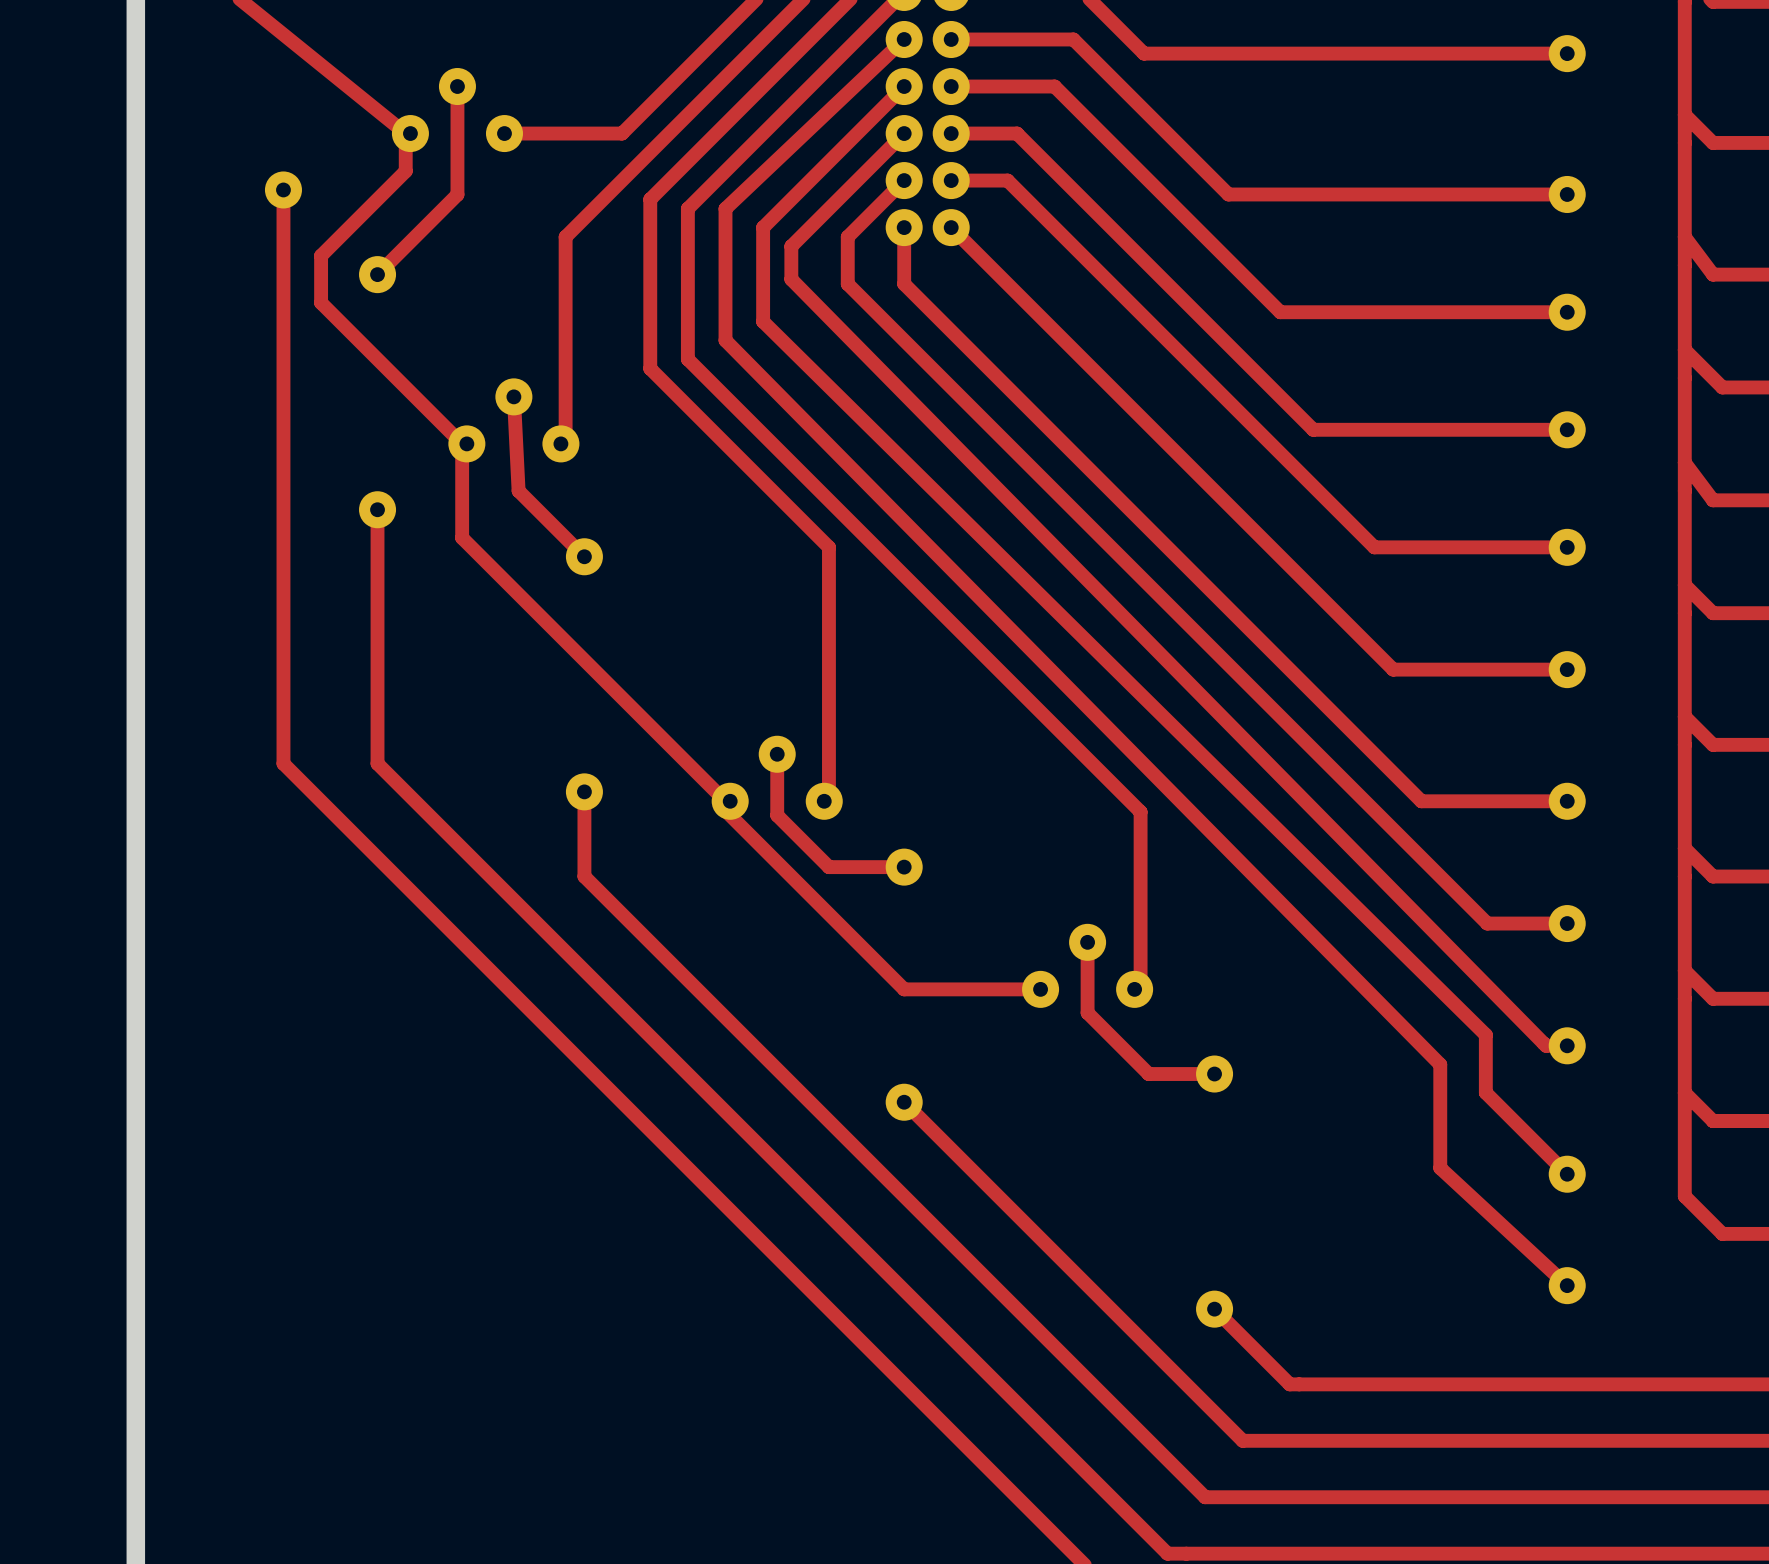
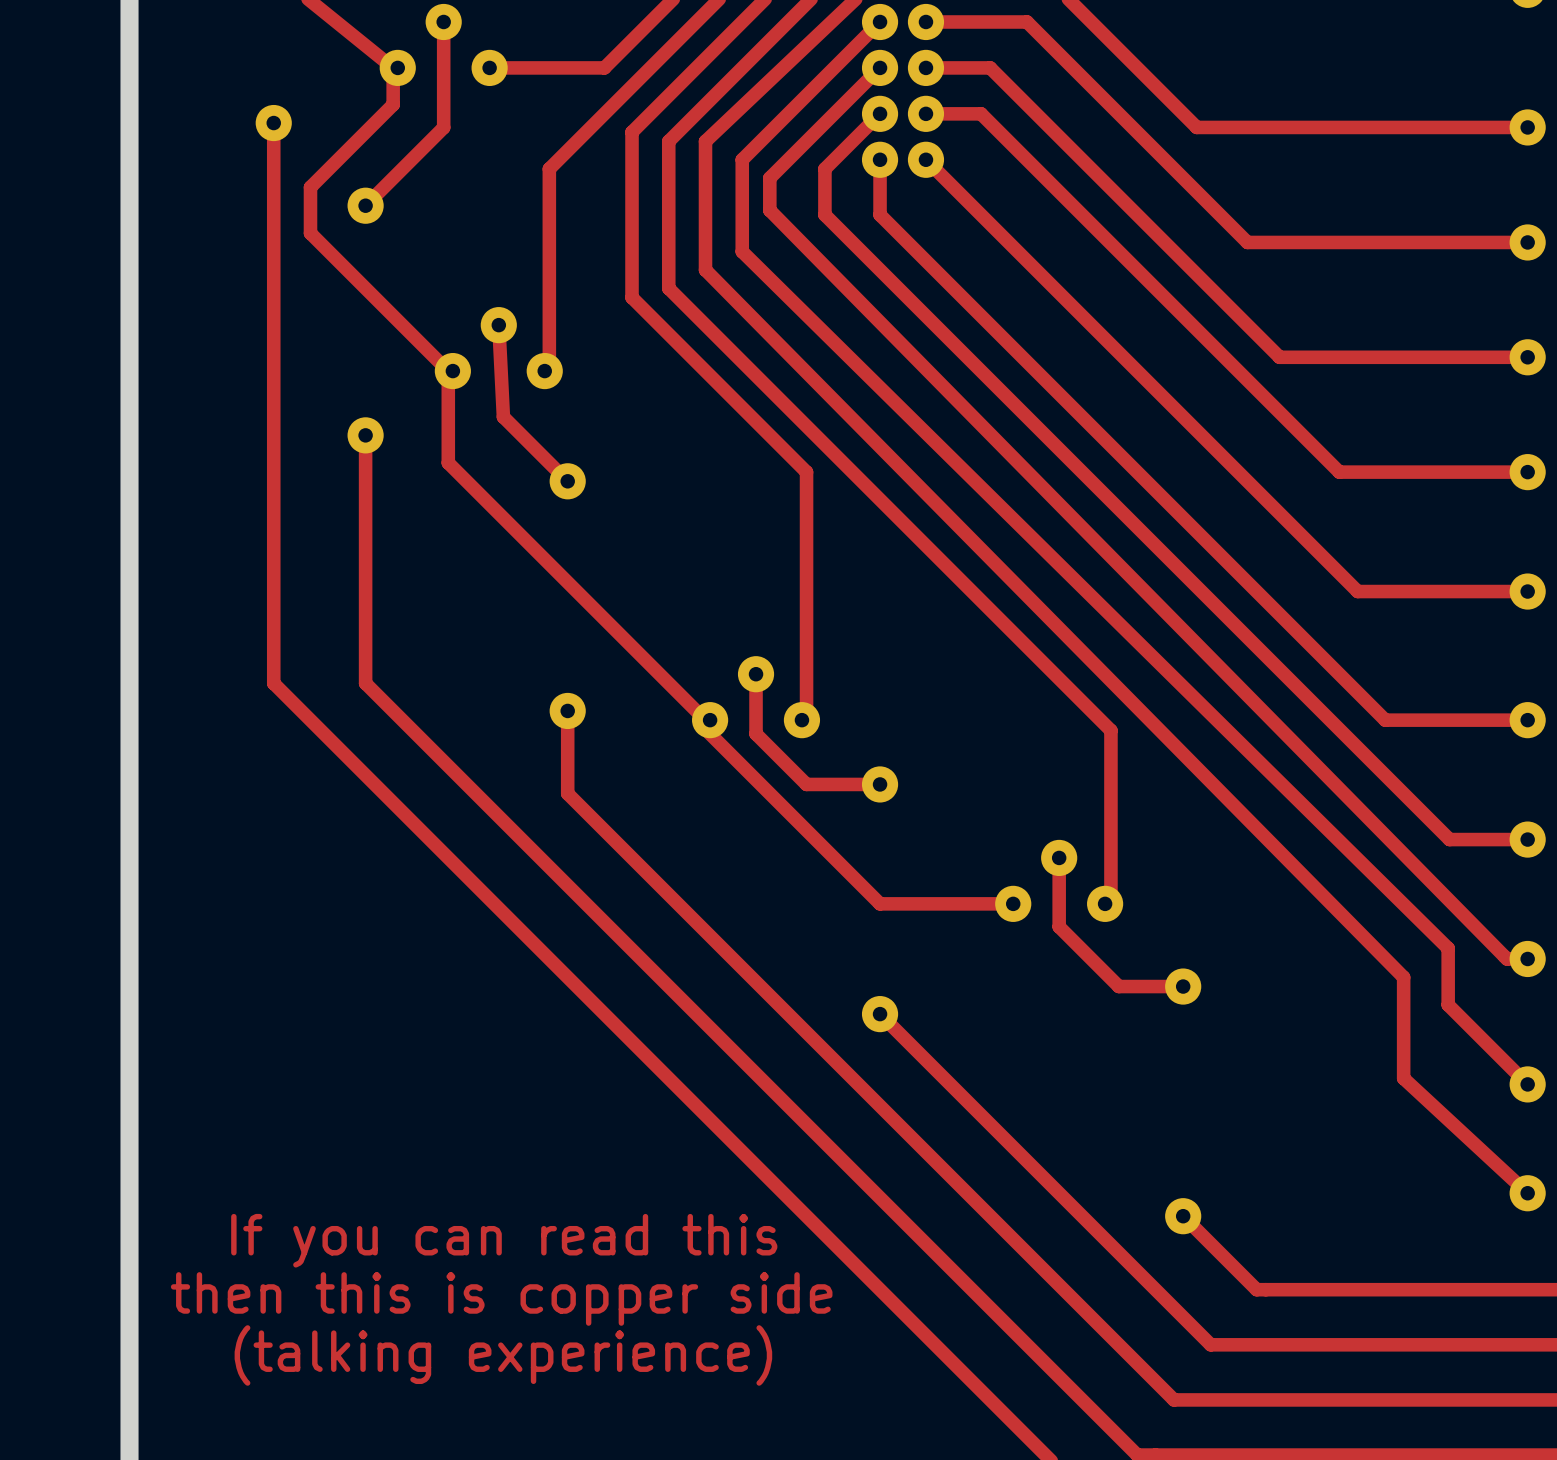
text: none -> If you can read this (504, 1240)
text: none -> then this is copper side (501, 1298)
text: none -> (talking experience) (503, 1355)

